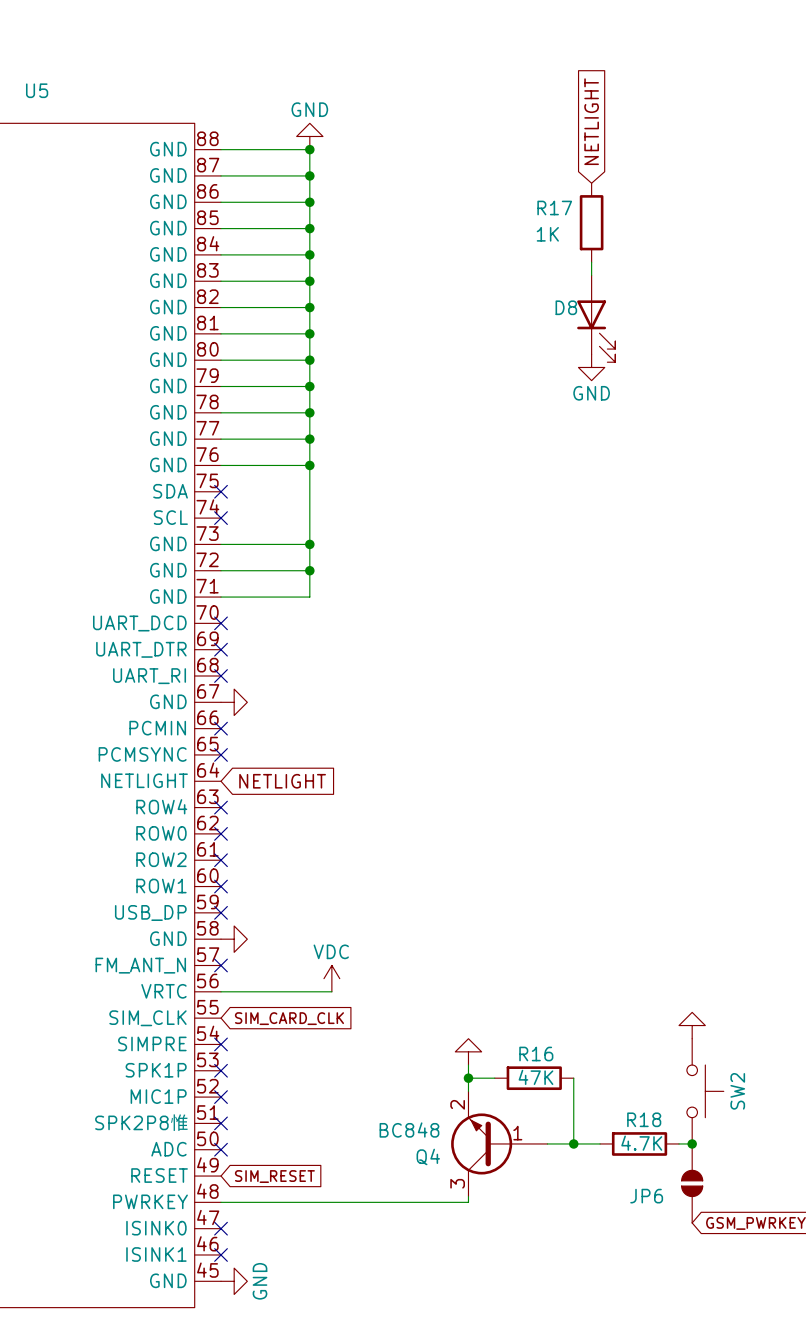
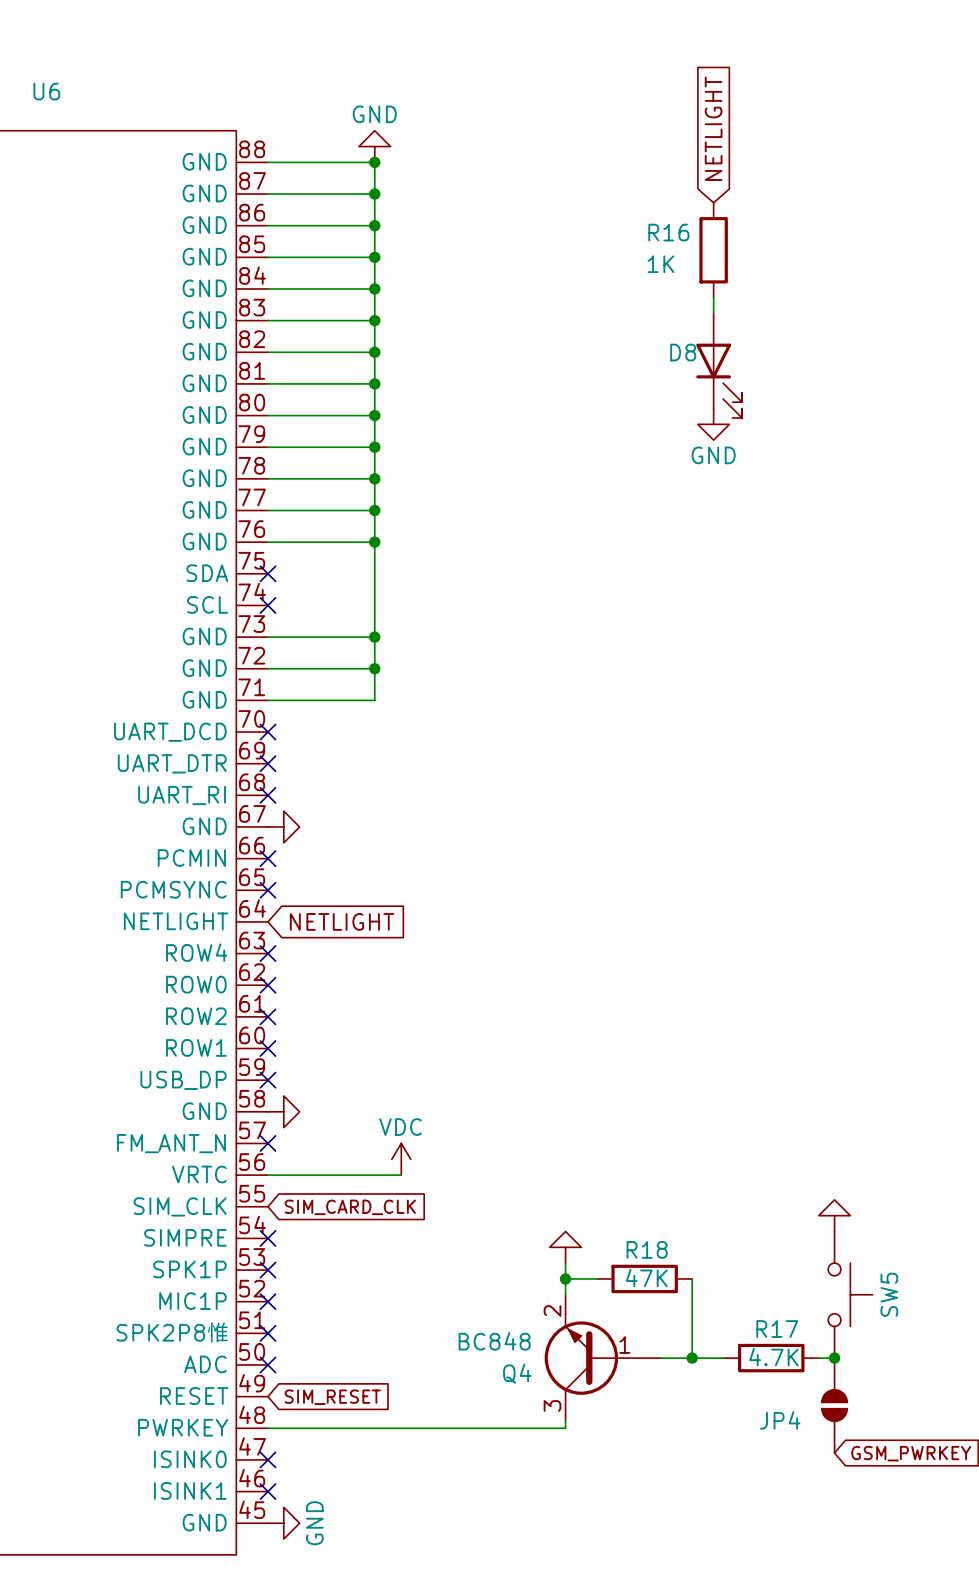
U5 name: U5 (37, 90) -> U6 (46, 91)
R17 name: R17 (554, 208) -> R16 (668, 232)
R16 name: R16 (536, 1054) -> R18 (647, 1249)
SW2 name: SW2 (737, 1091) -> SW5 (889, 1294)
R18 name: R18 (644, 1119) -> R17 (777, 1329)
JP6 name: JP6 (646, 1196) -> JP4 (780, 1420)

